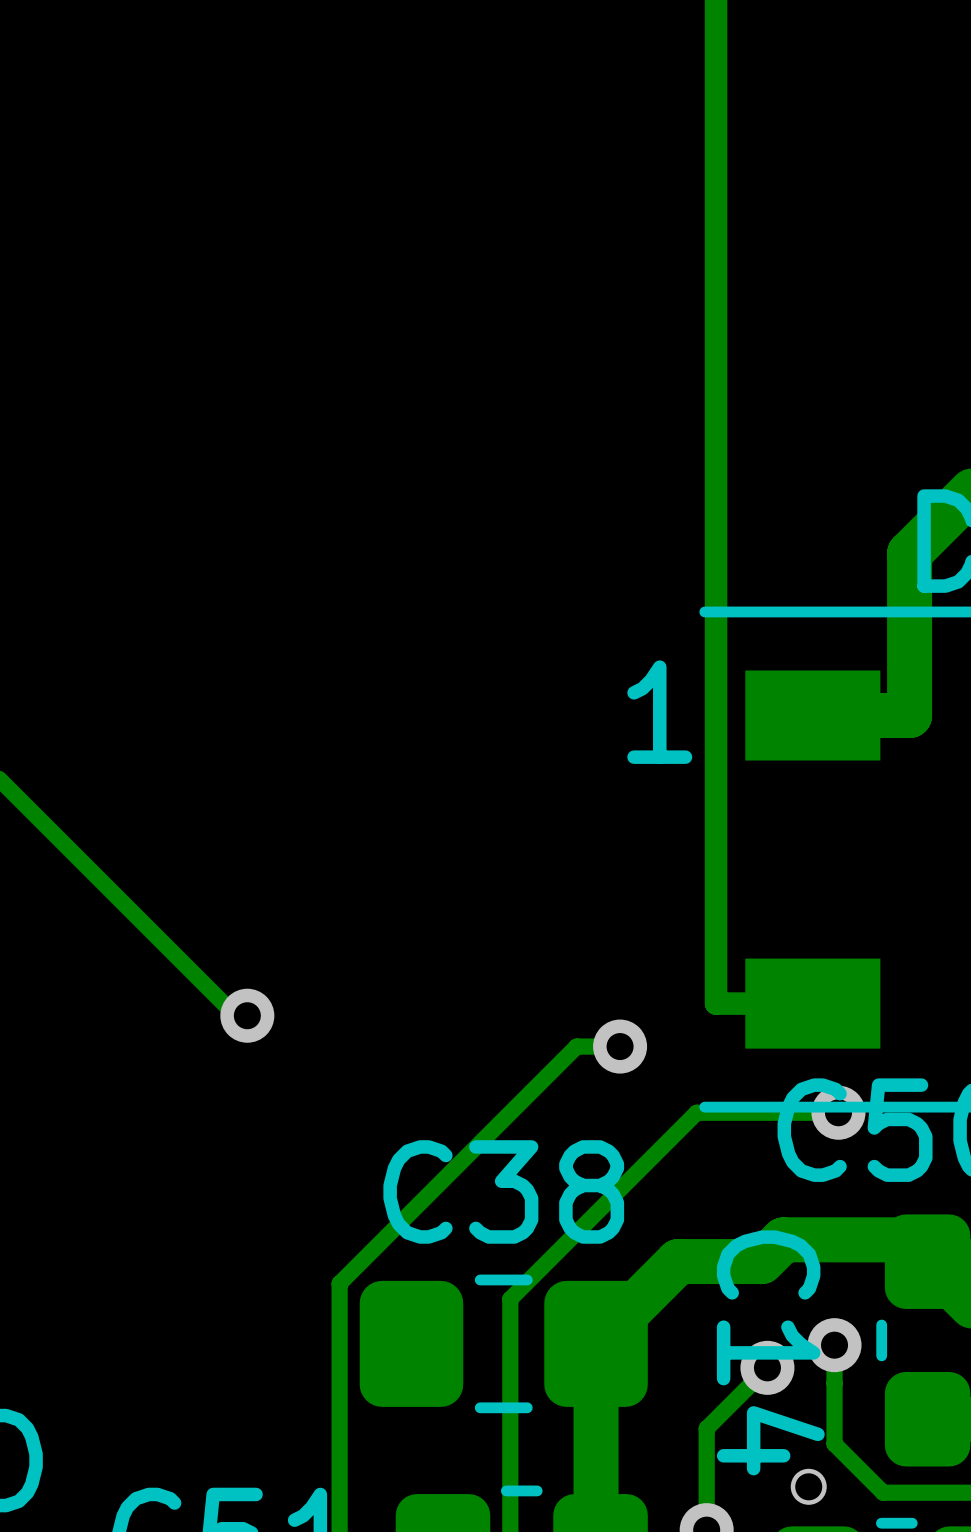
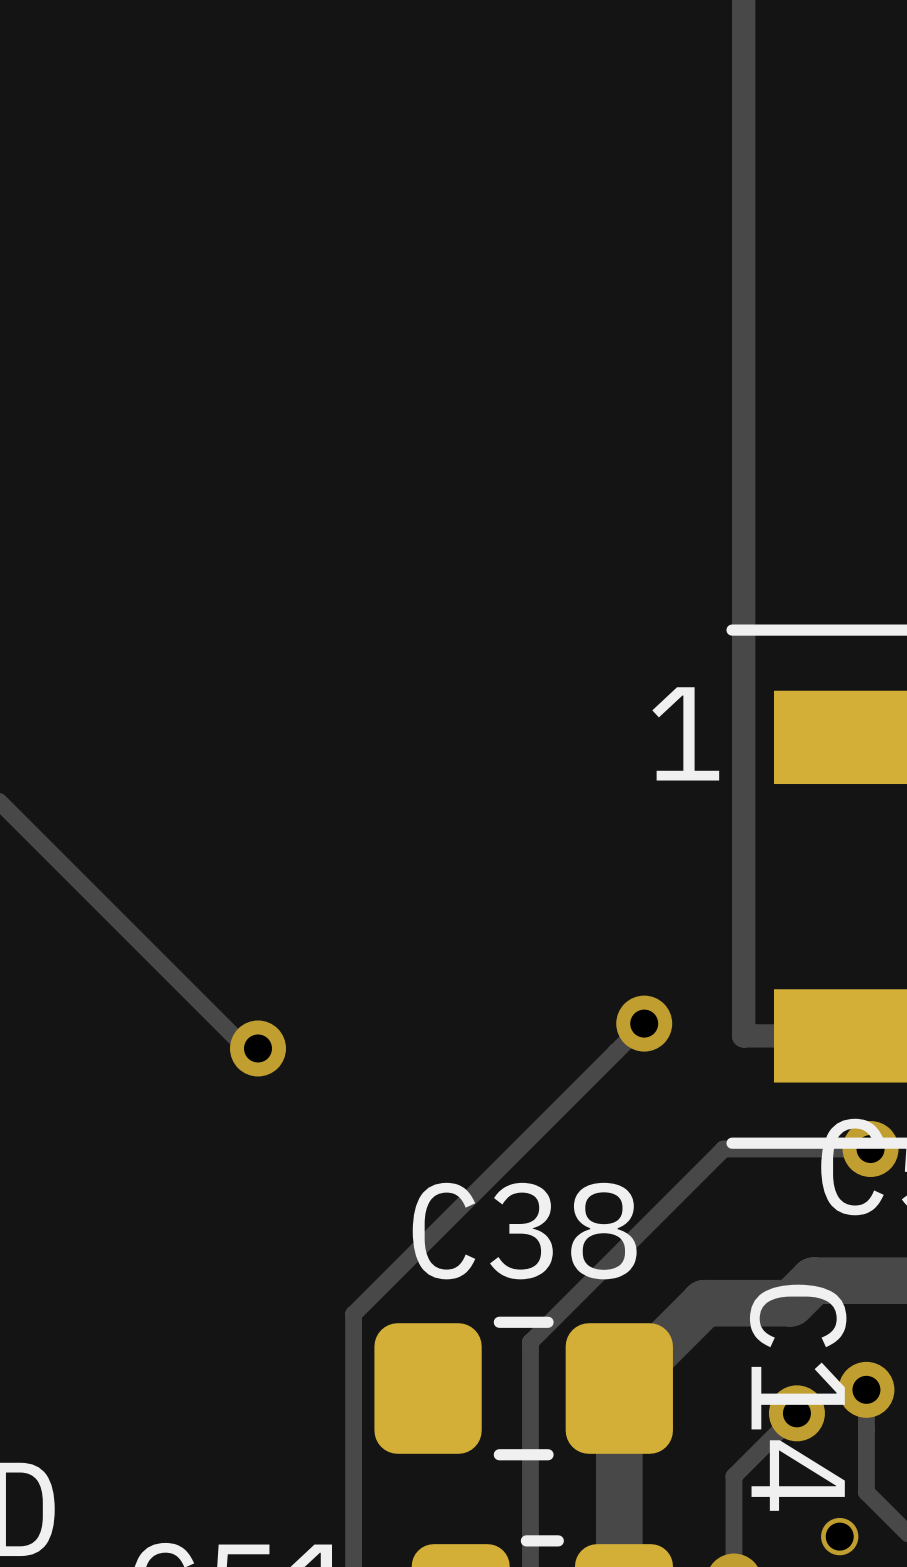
track: (620, 1046) (576, 1046) (339, 1283) -> (644, 1023) (353, 1314) (353, 1326)
via position: (620, 1046) -> (644, 1023)

